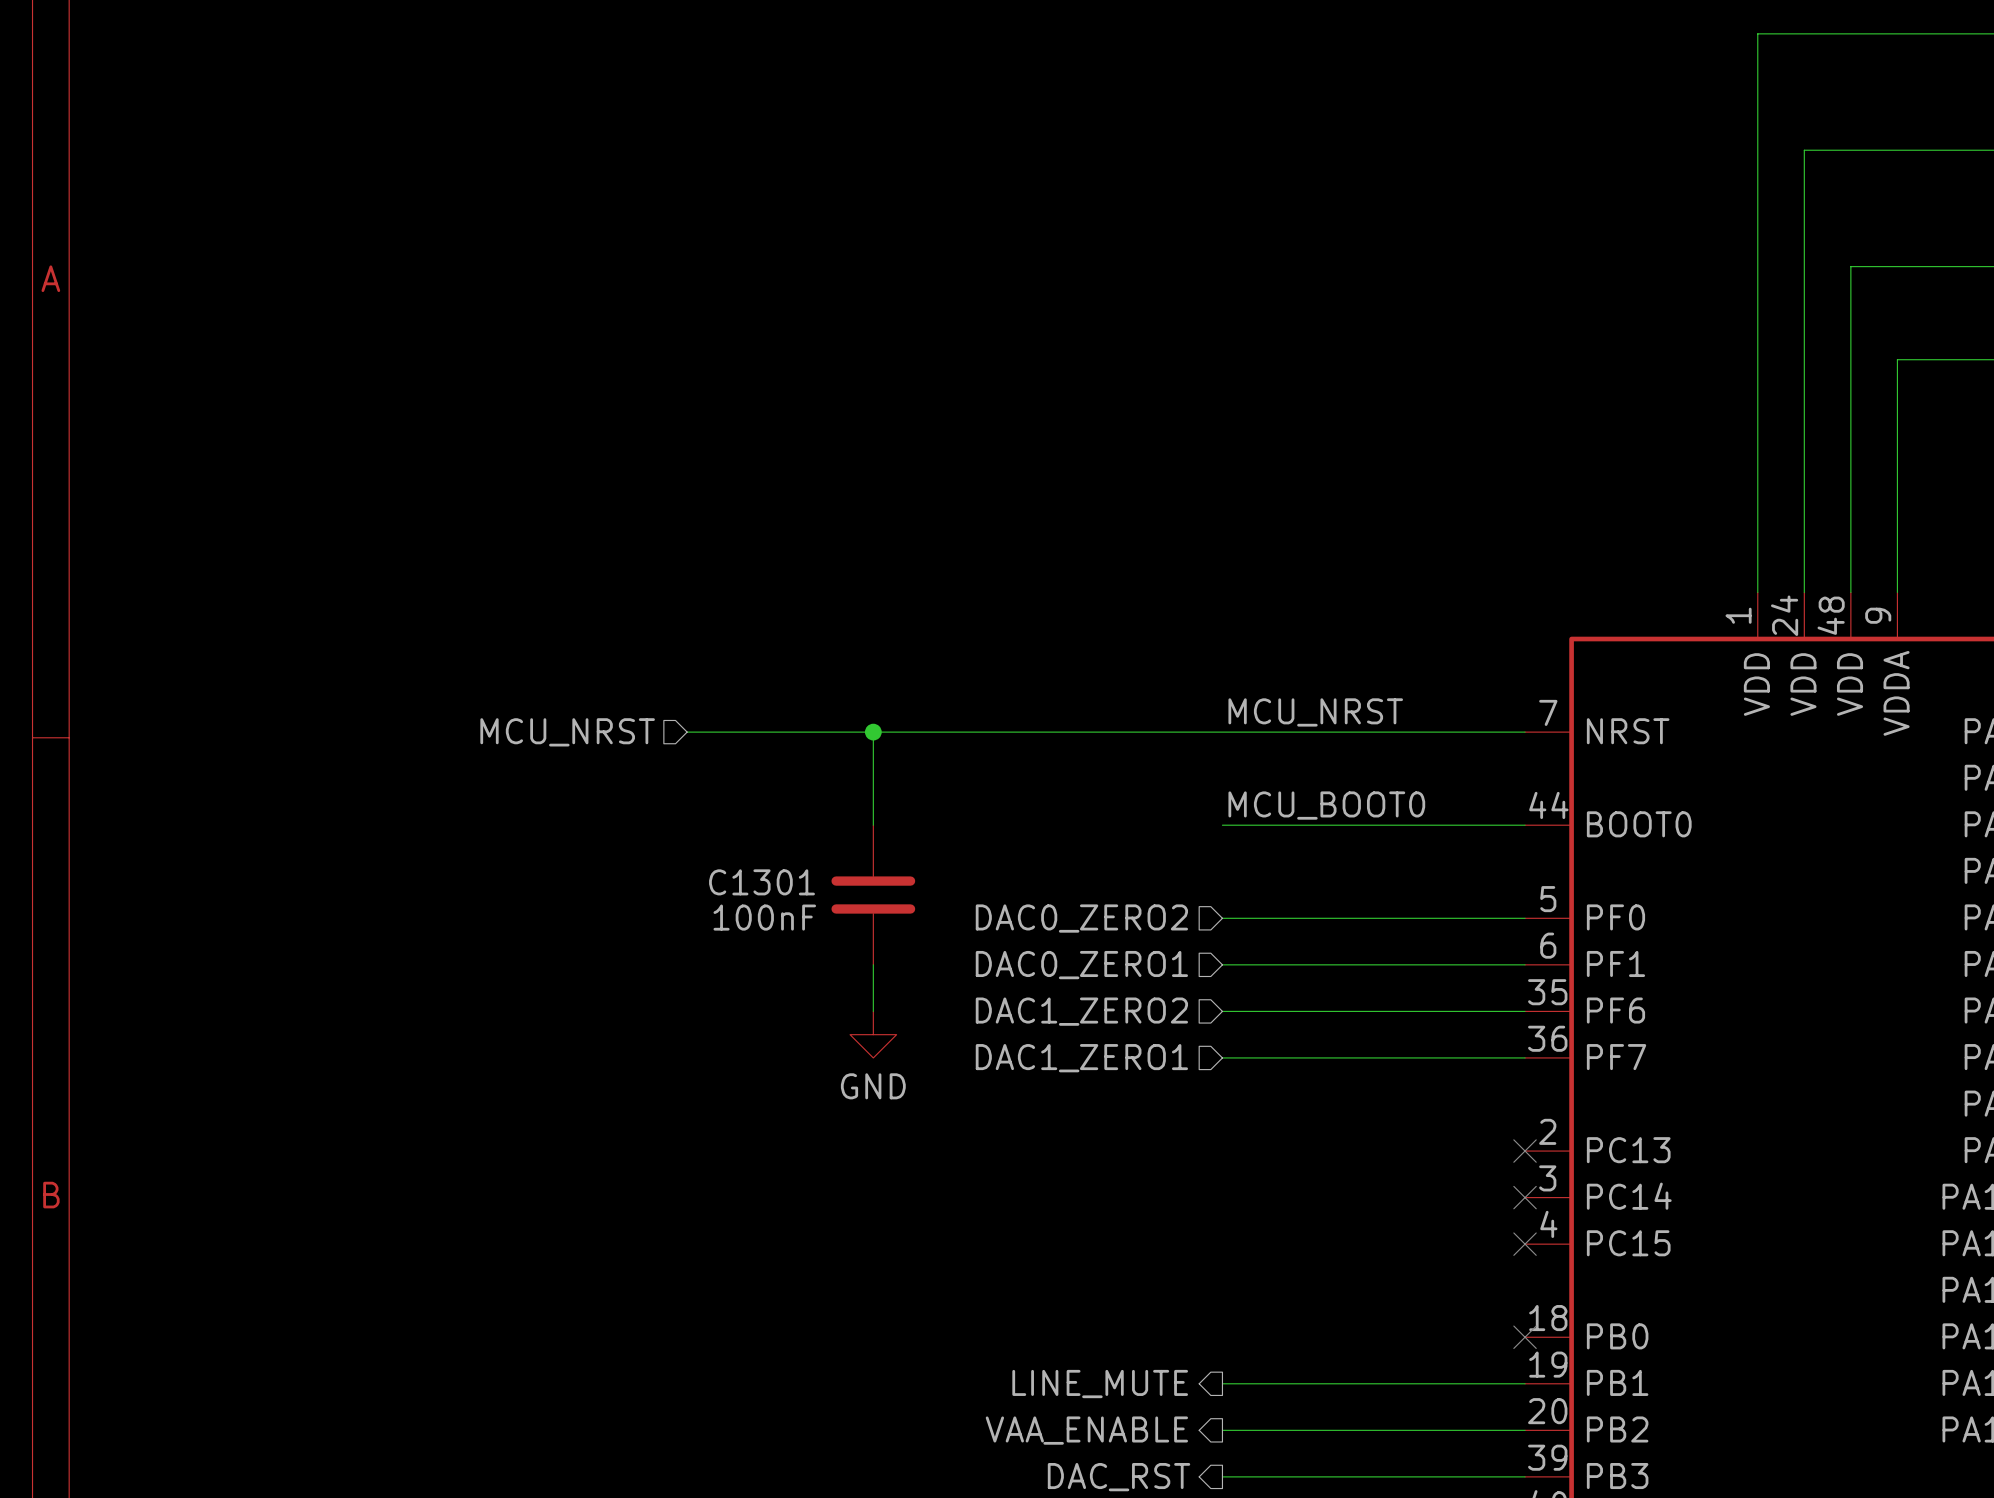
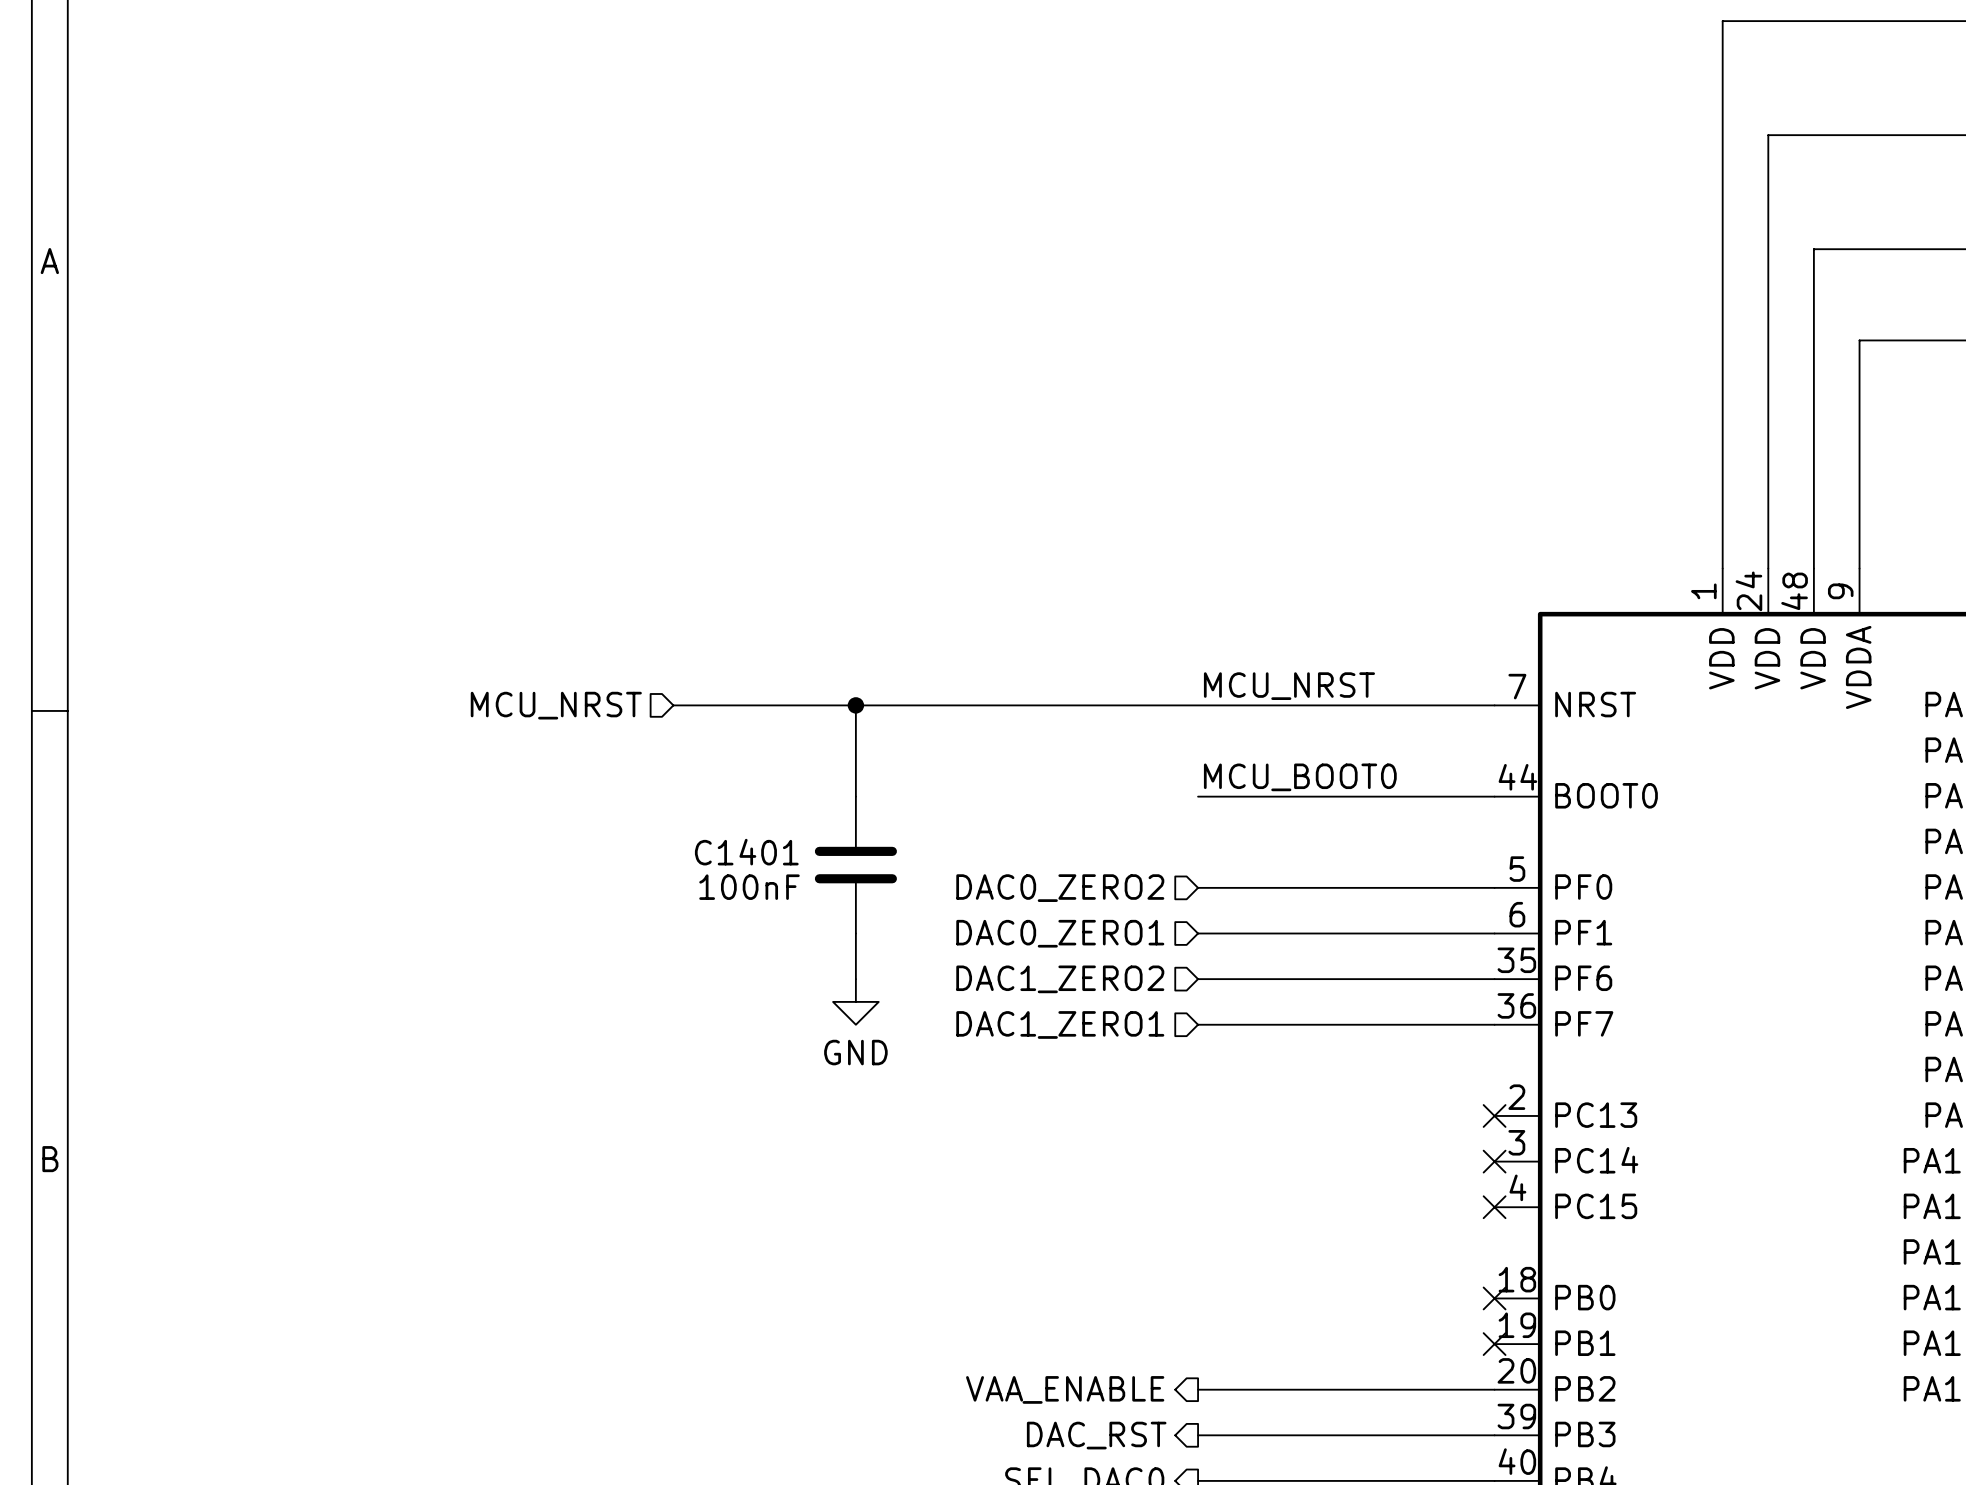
C1301 name: C1301 (762, 882) -> C1401 (746, 852)
wire: (1222, 1383) (1525, 1383) -> none
no-connect mark: none -> (1494, 1344)
hierarchical label: LINE_MUTE (1100, 1384) -> none

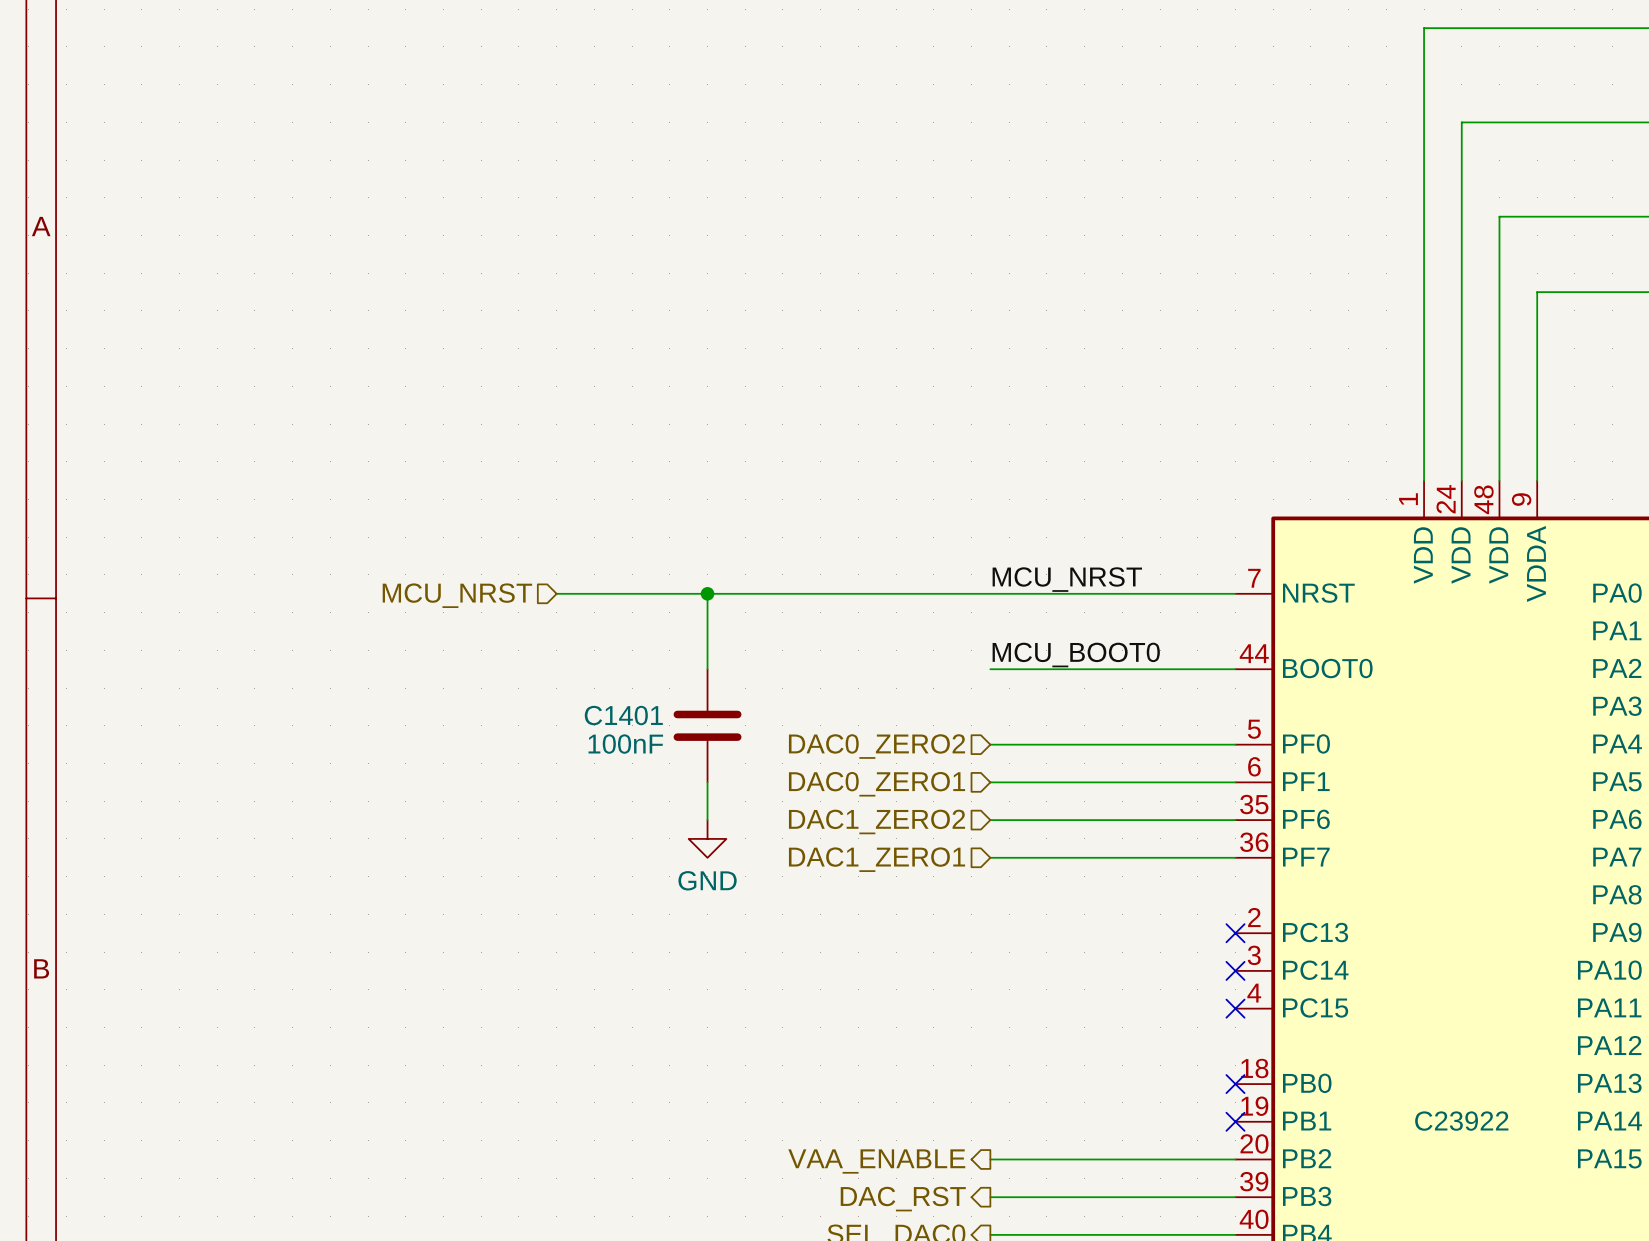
part text: none -> C23922 (1461, 1121)

